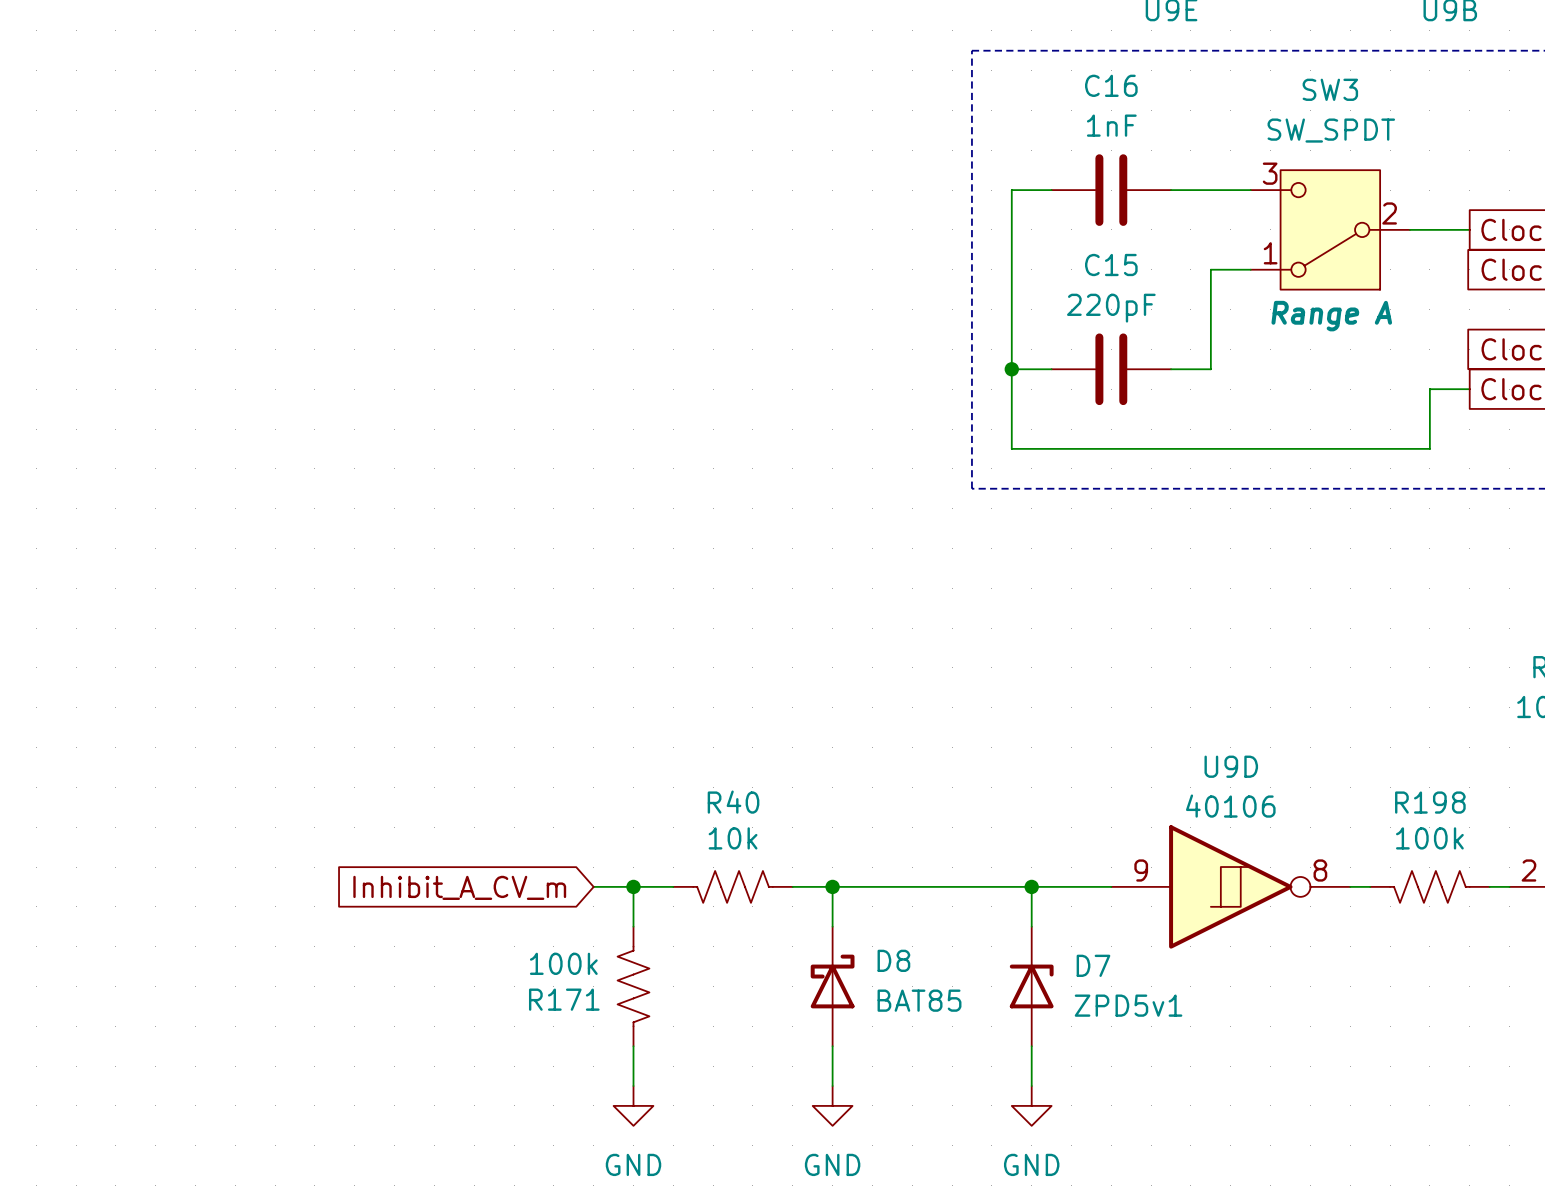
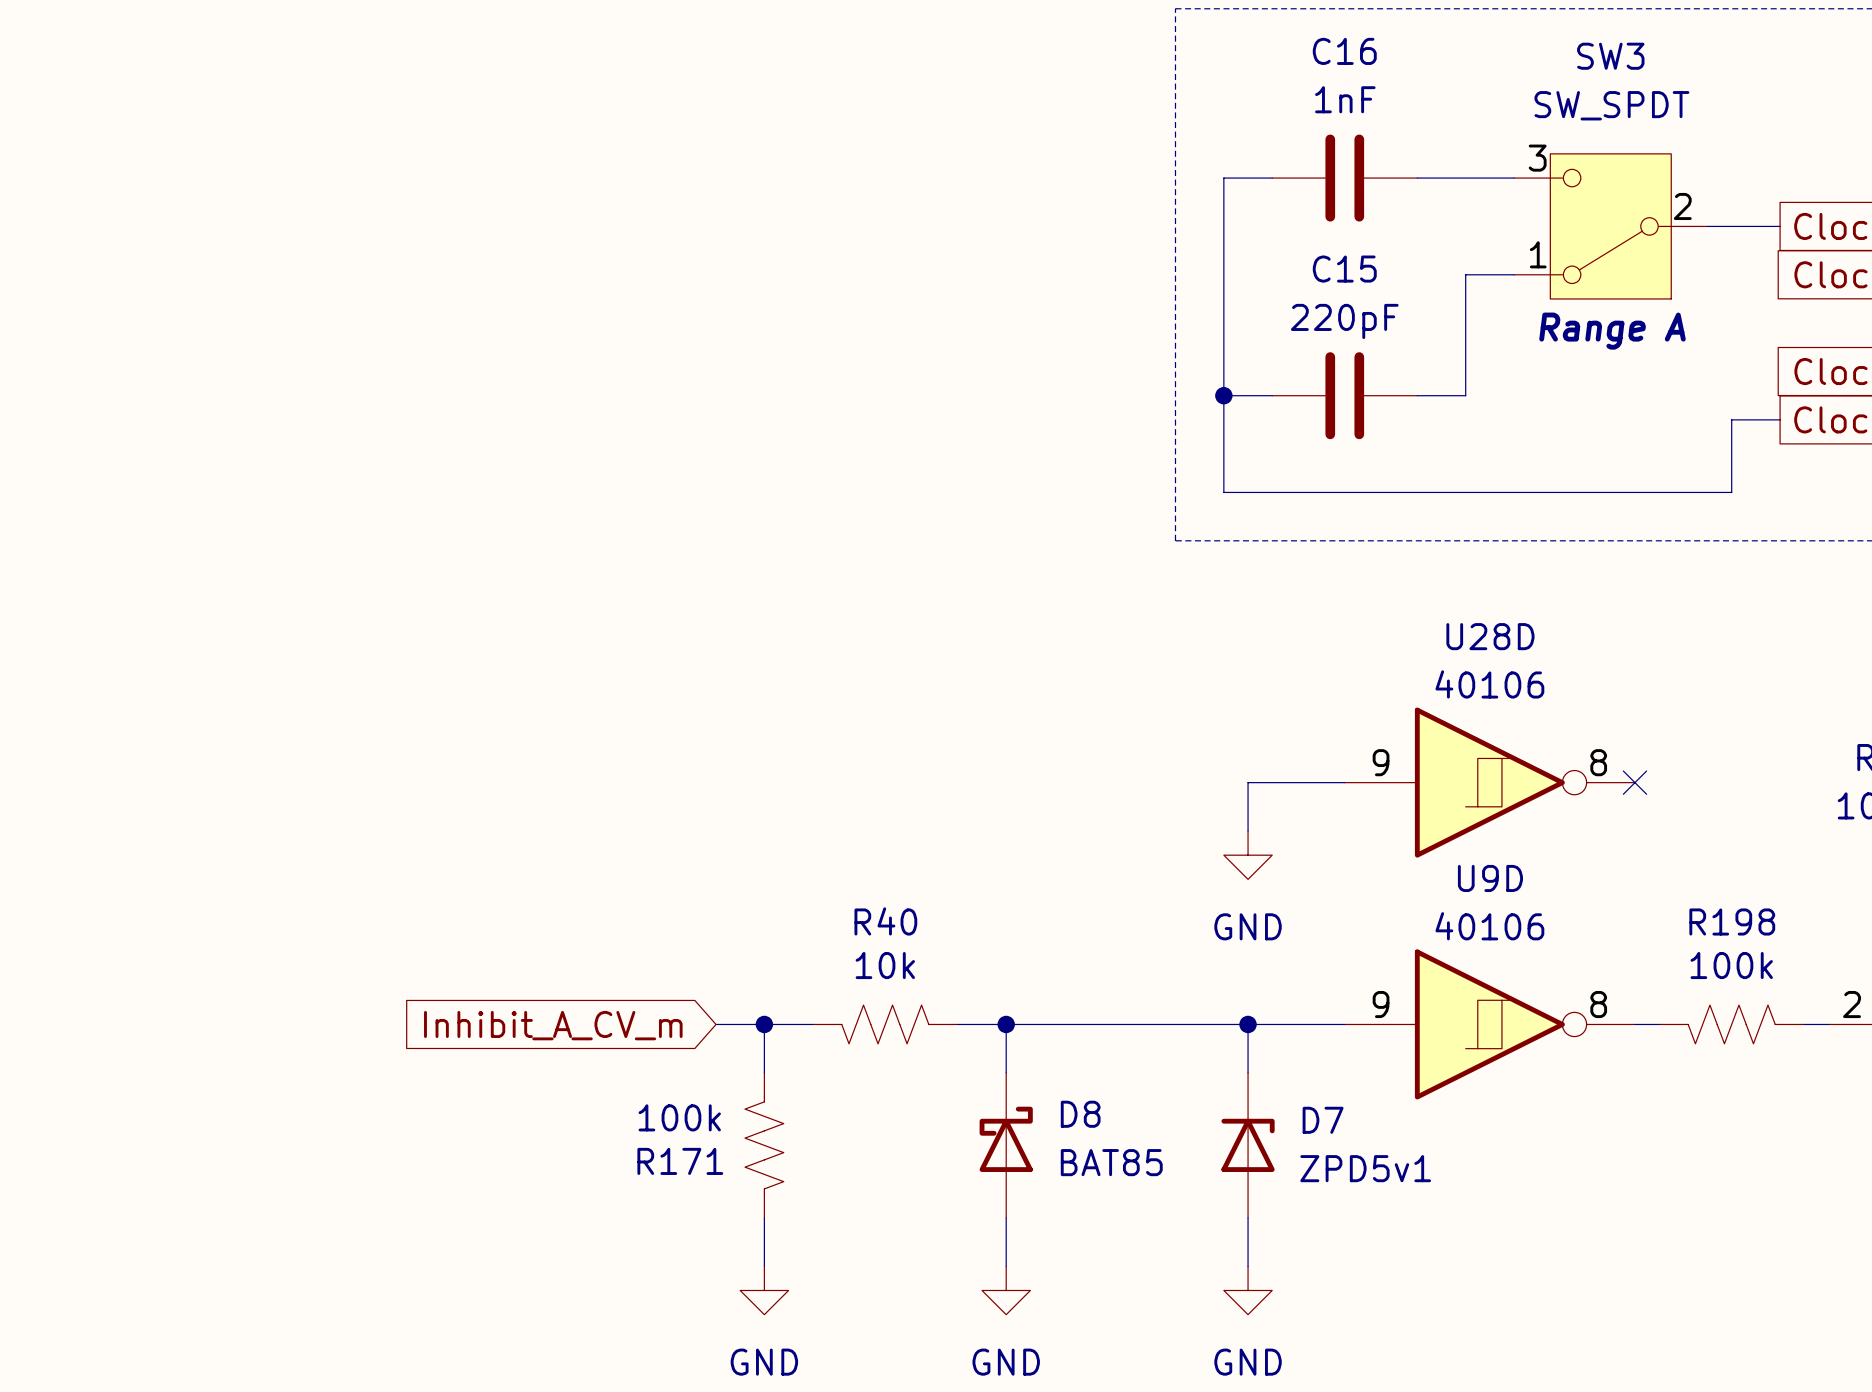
wire: none -> (1344, 782) (1248, 782) (1248, 831)
U28D: none -> 40106 (1489, 782)
no-connect mark: none -> (1634, 782)
power symbol: none -> GND (1248, 855)

